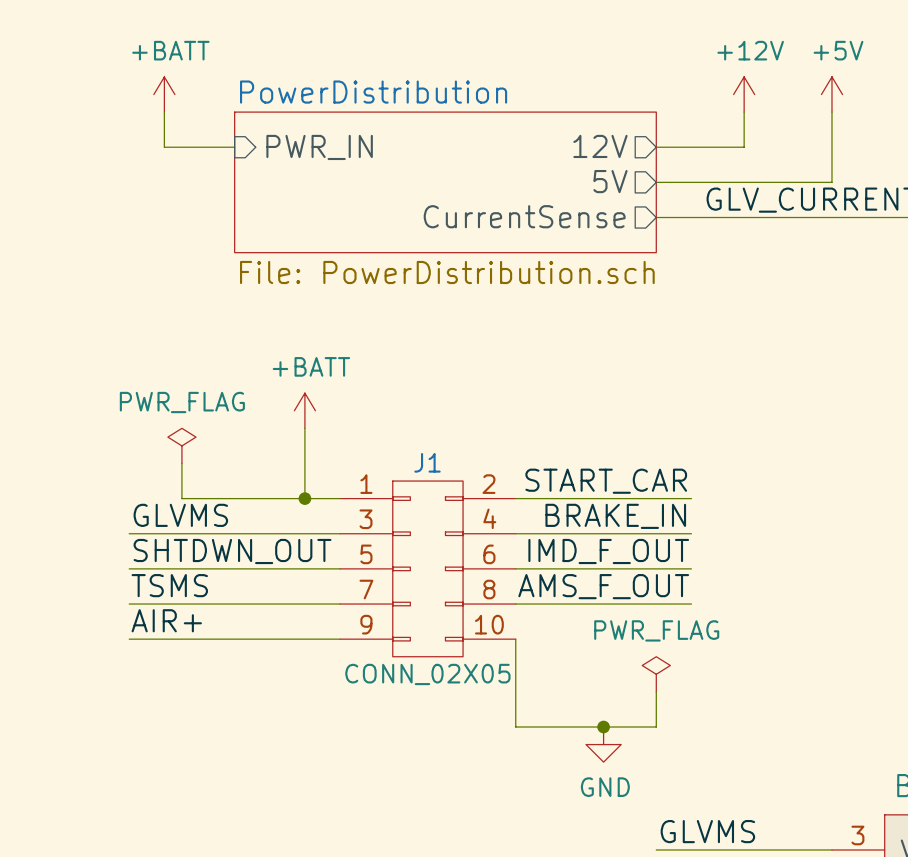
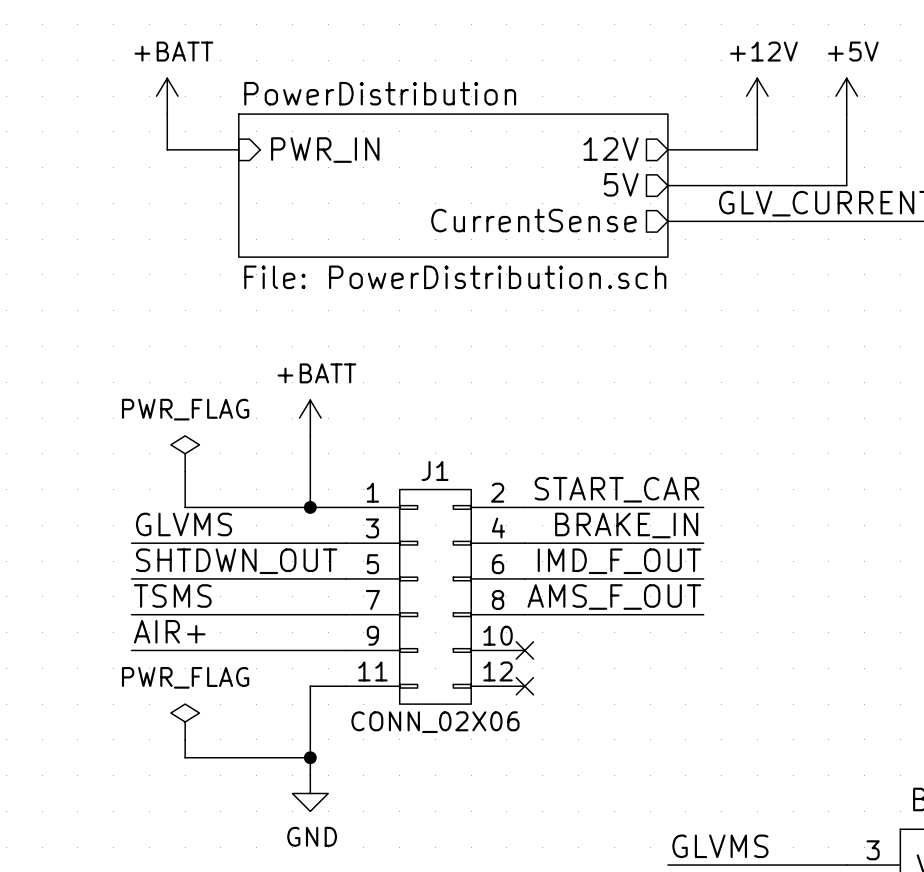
J1 symbol: [340, 481, 516, 657] -> [346, 489, 525, 705]
wire: (515, 639) (515, 727) (656, 727) (656, 691) -> none
no-connect mark: none -> (524, 650)
wire: none -> (346, 686) (310, 686) (310, 775)
J1 value: CONN_02X05 (427, 674) -> CONN_02X06 (435, 722)
no-connect mark: none -> (524, 686)
power symbol: PWR_FLAG (656, 674) -> none
power symbol: none -> PWR_FLAG (185, 721)
wire: none -> (185, 739) (185, 757) (310, 757)
junction: (603, 727) -> none
junction: none -> (310, 757)
power symbol position: GND (603, 744) -> GND (310, 793)

